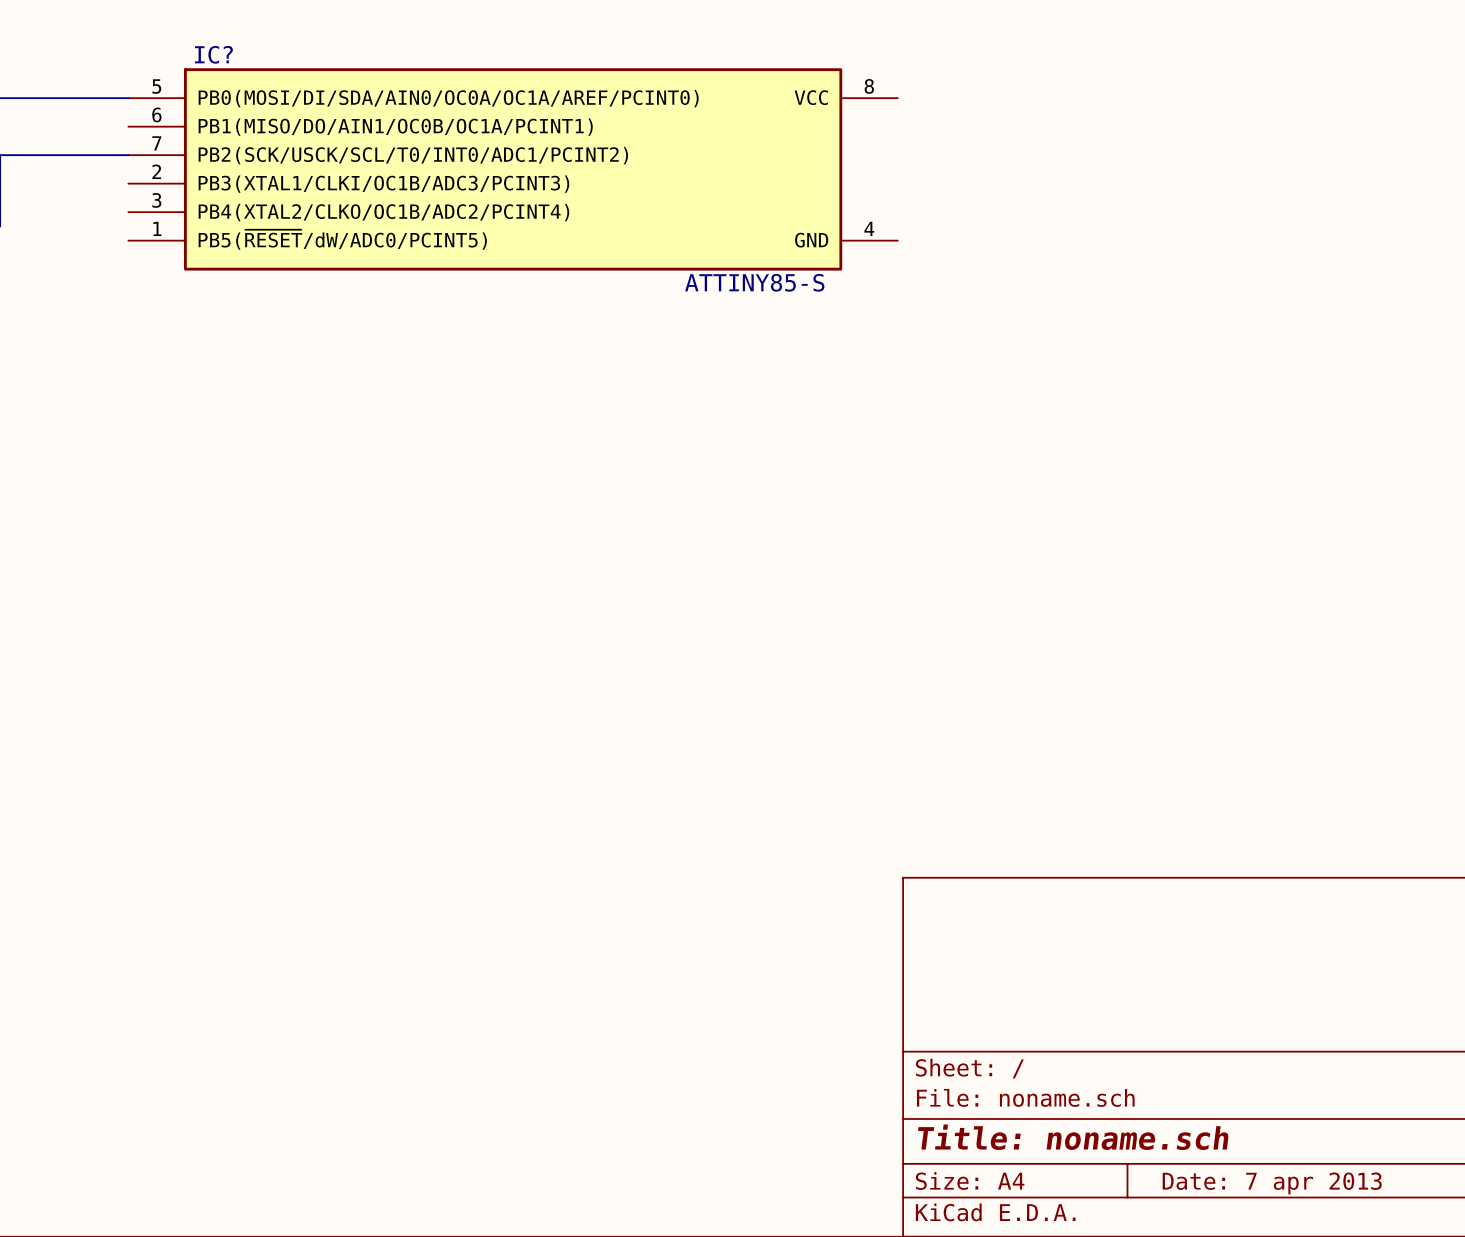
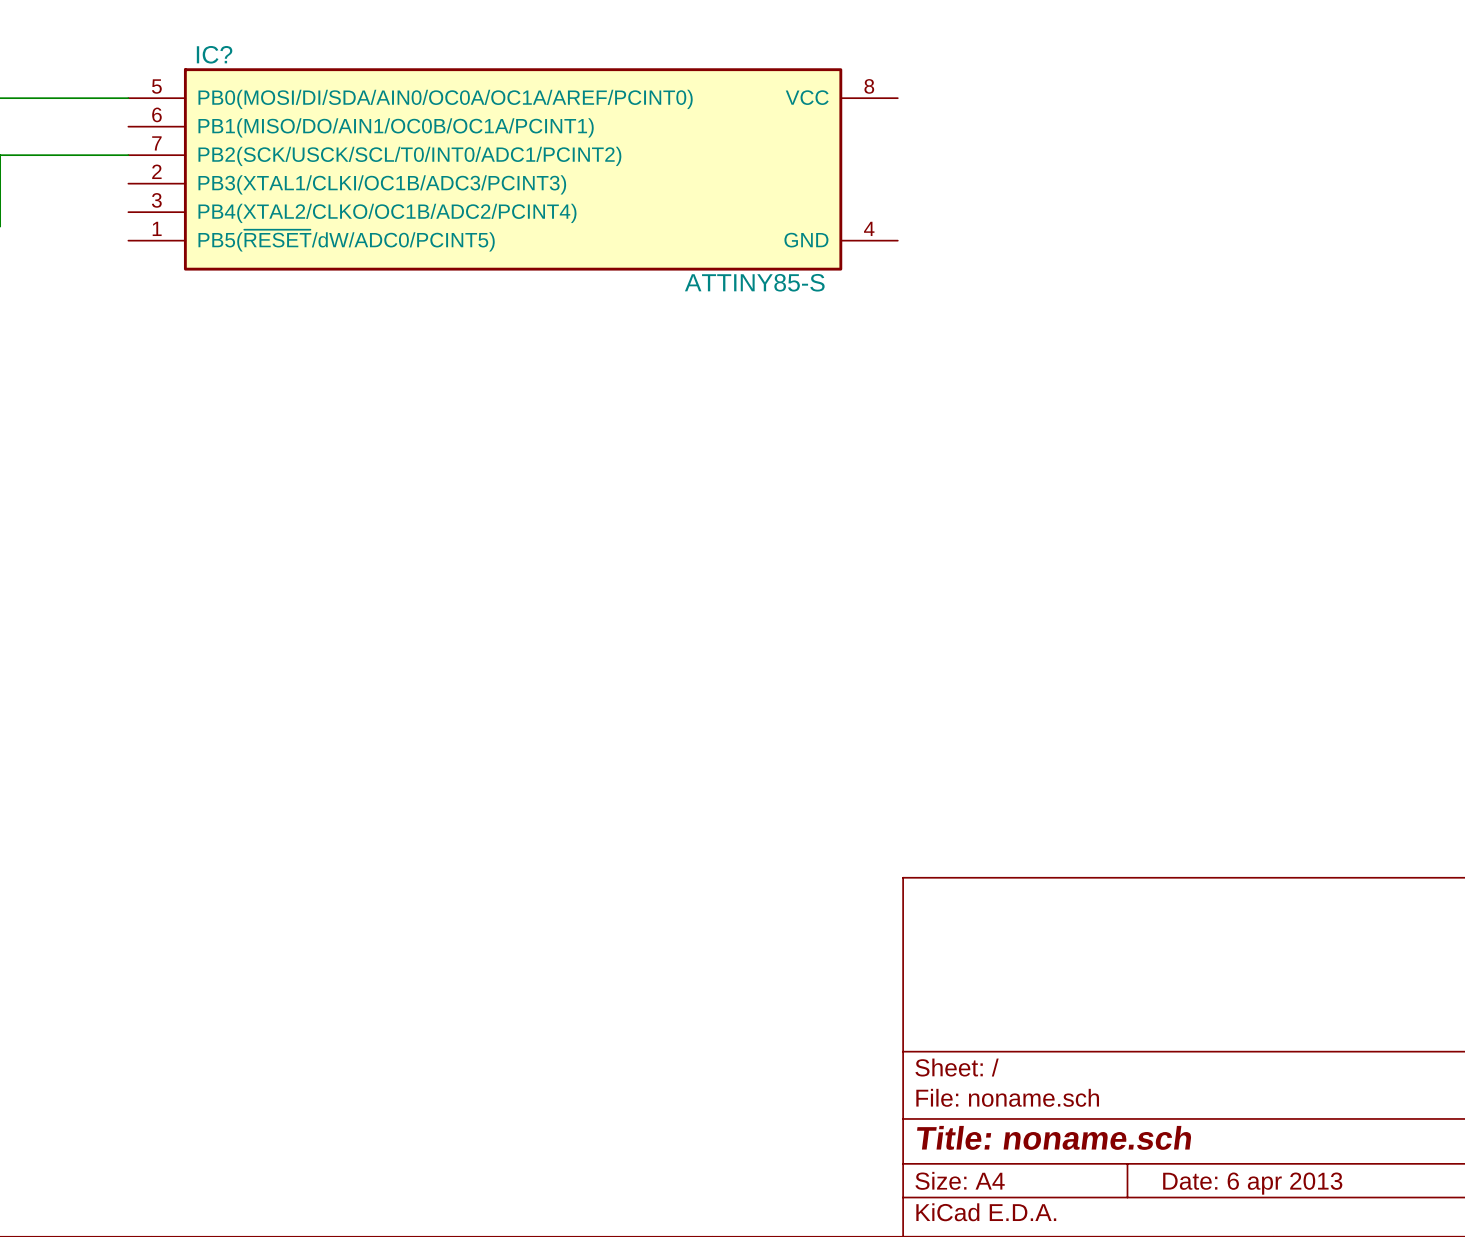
title block: Date: 7 apr 2013 (1272, 1183) -> Date: 6 apr 2013 (1252, 1183)

